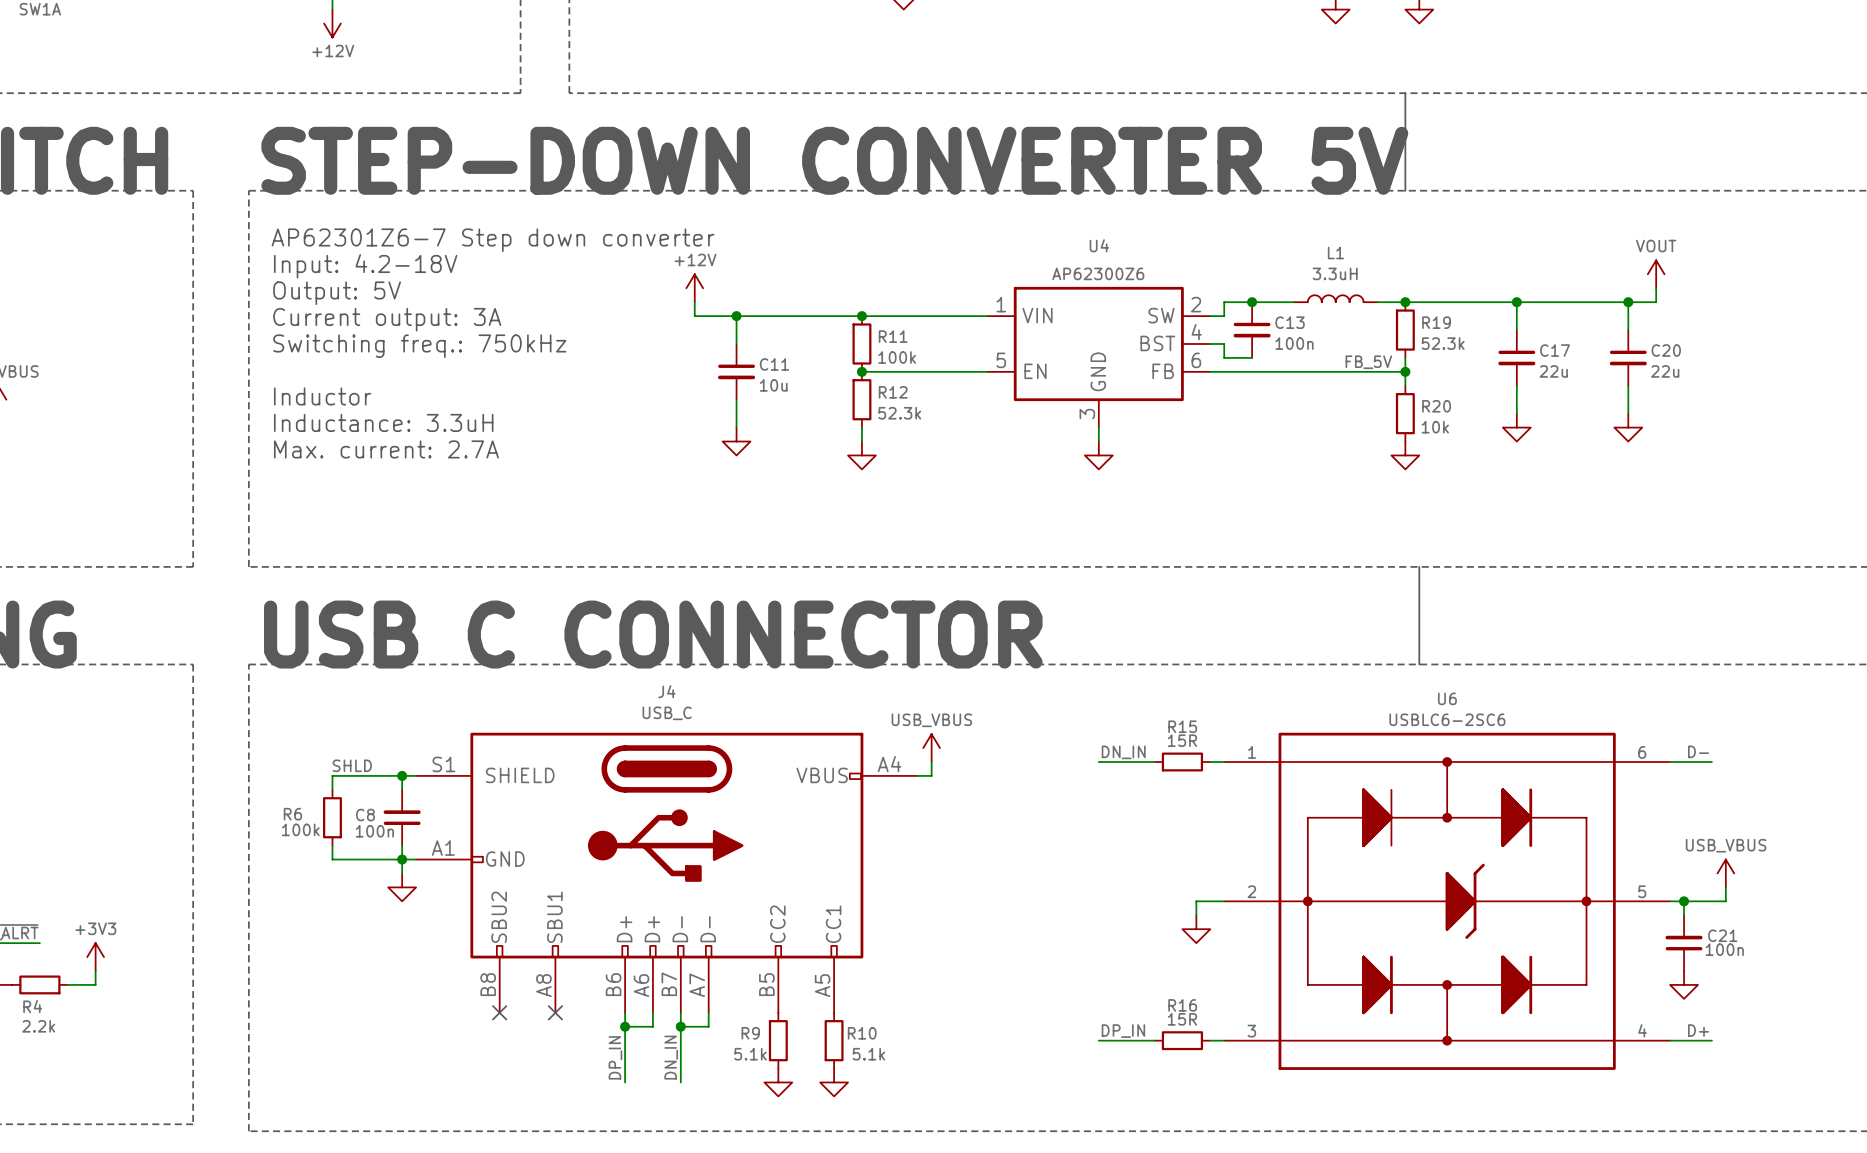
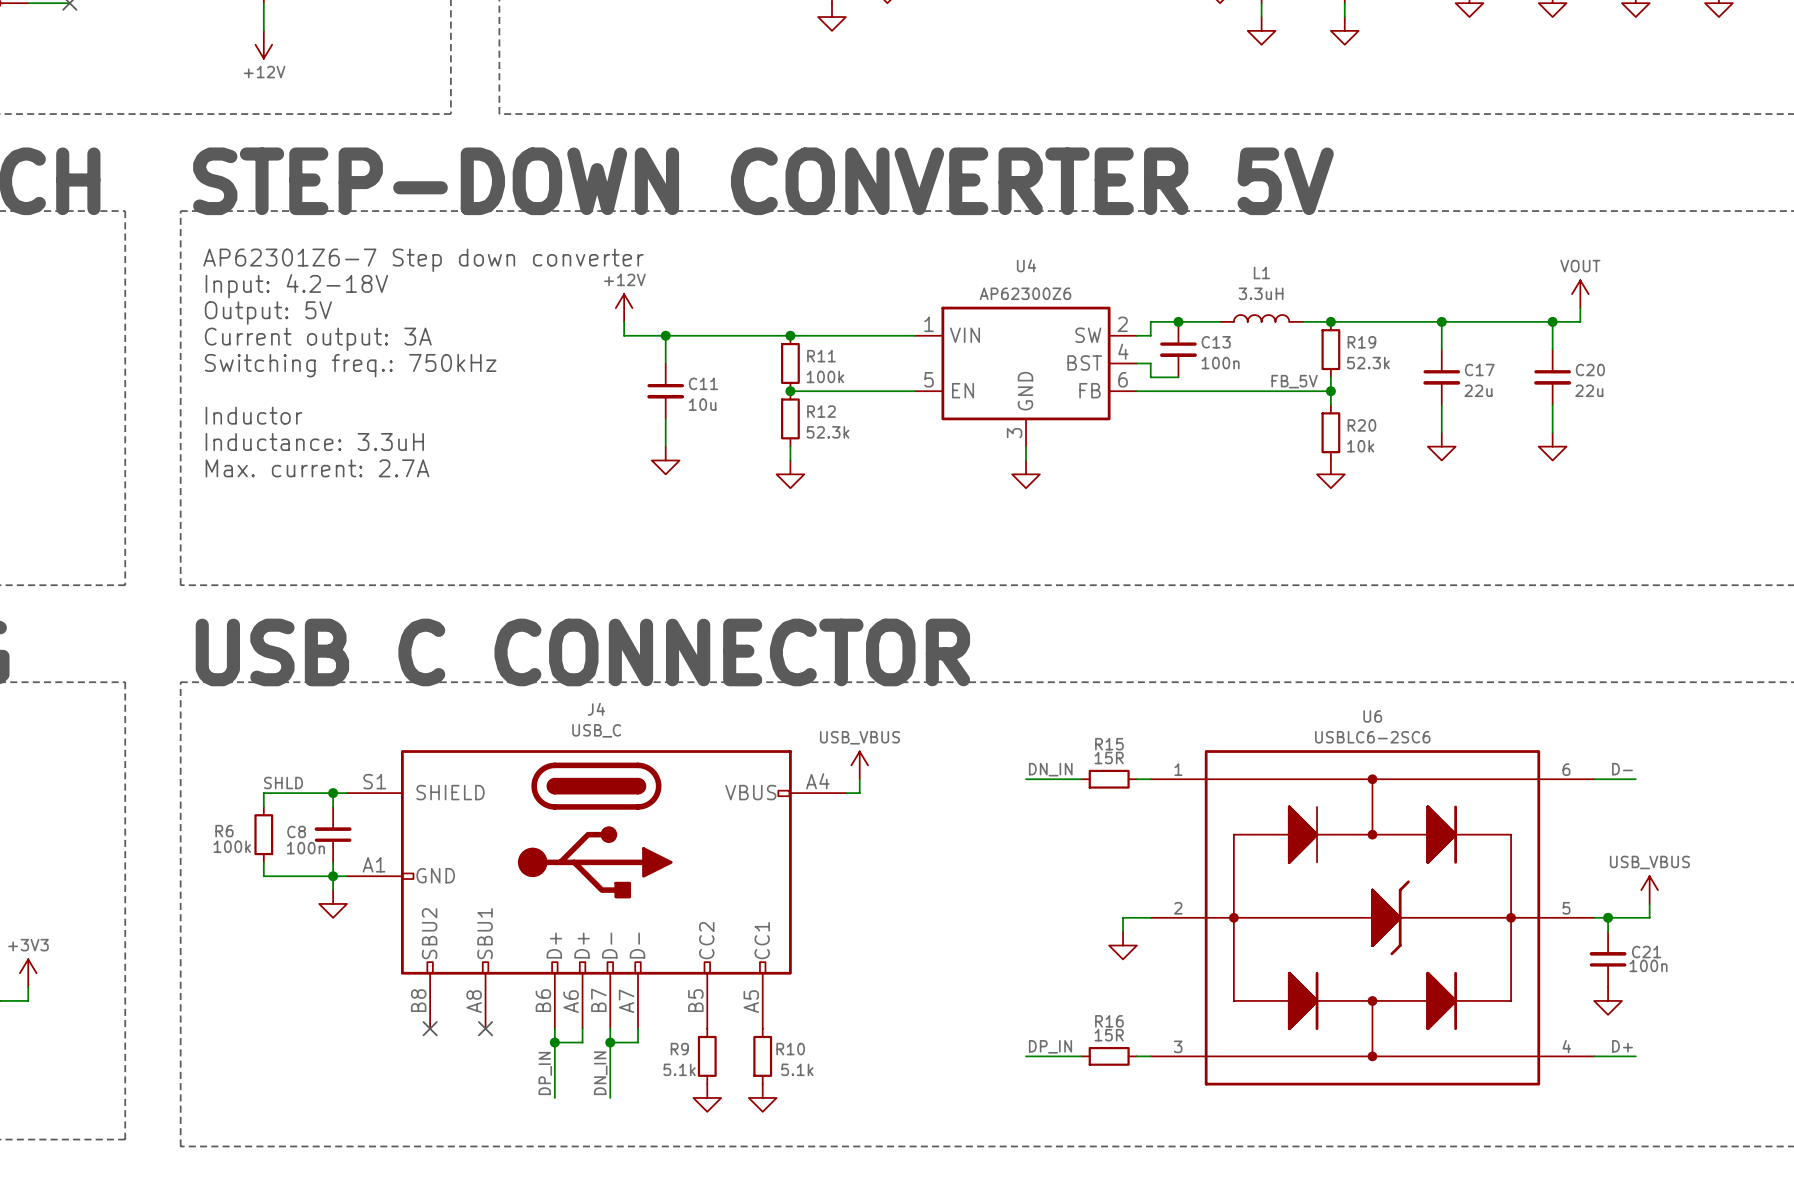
line: (1405, 93) (1405, 190) -> none
line: (1419, 566) (1419, 664) -> none

